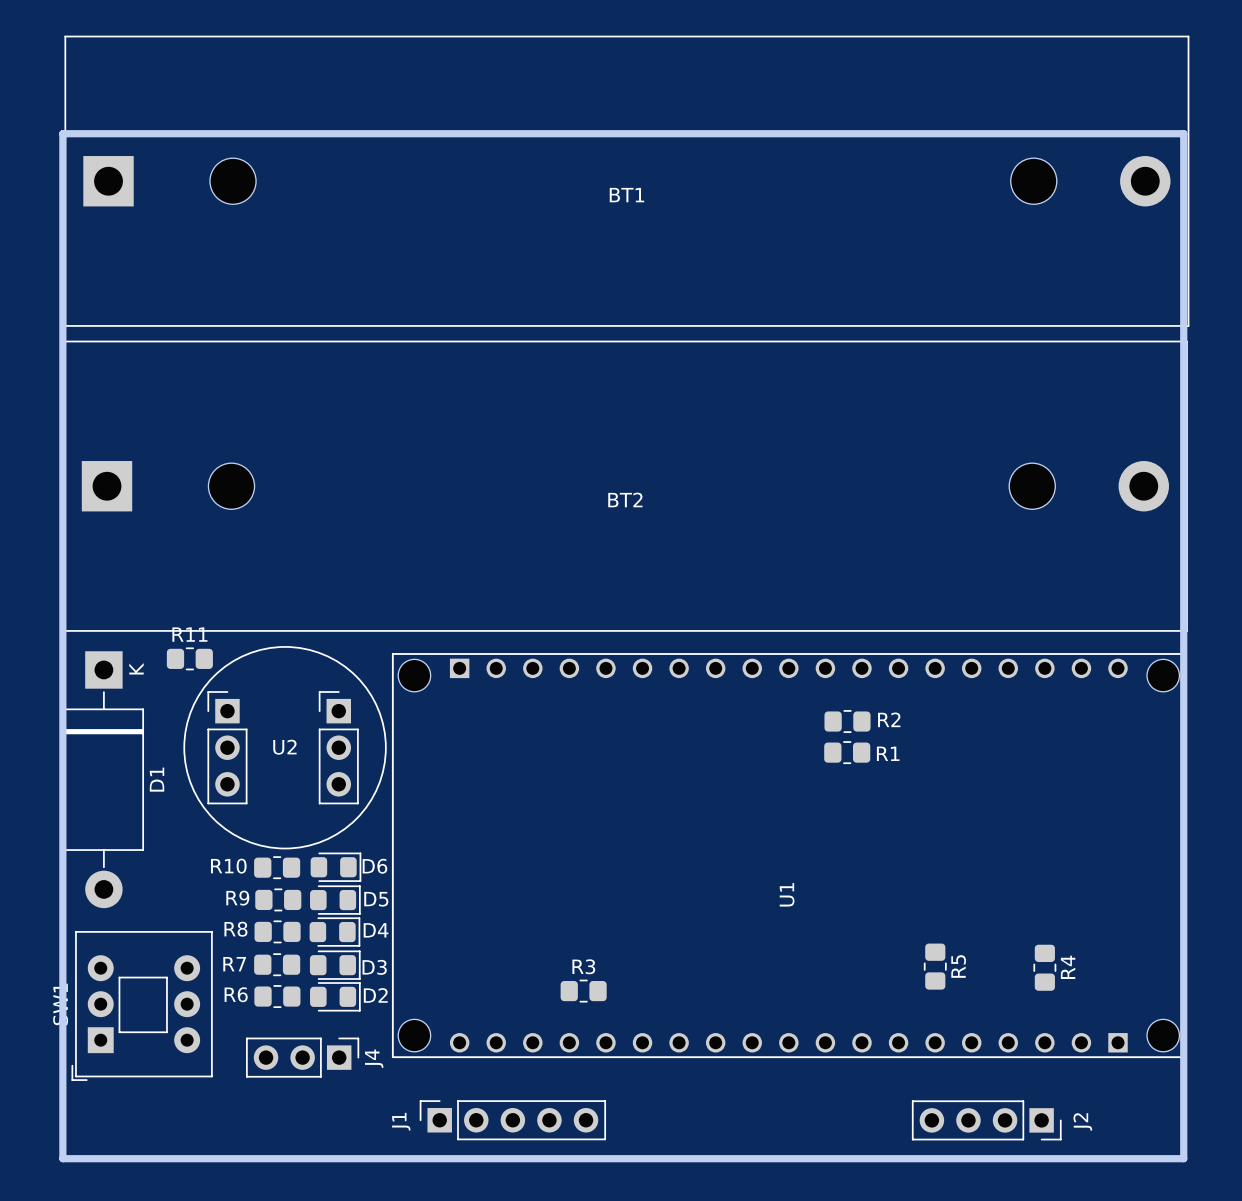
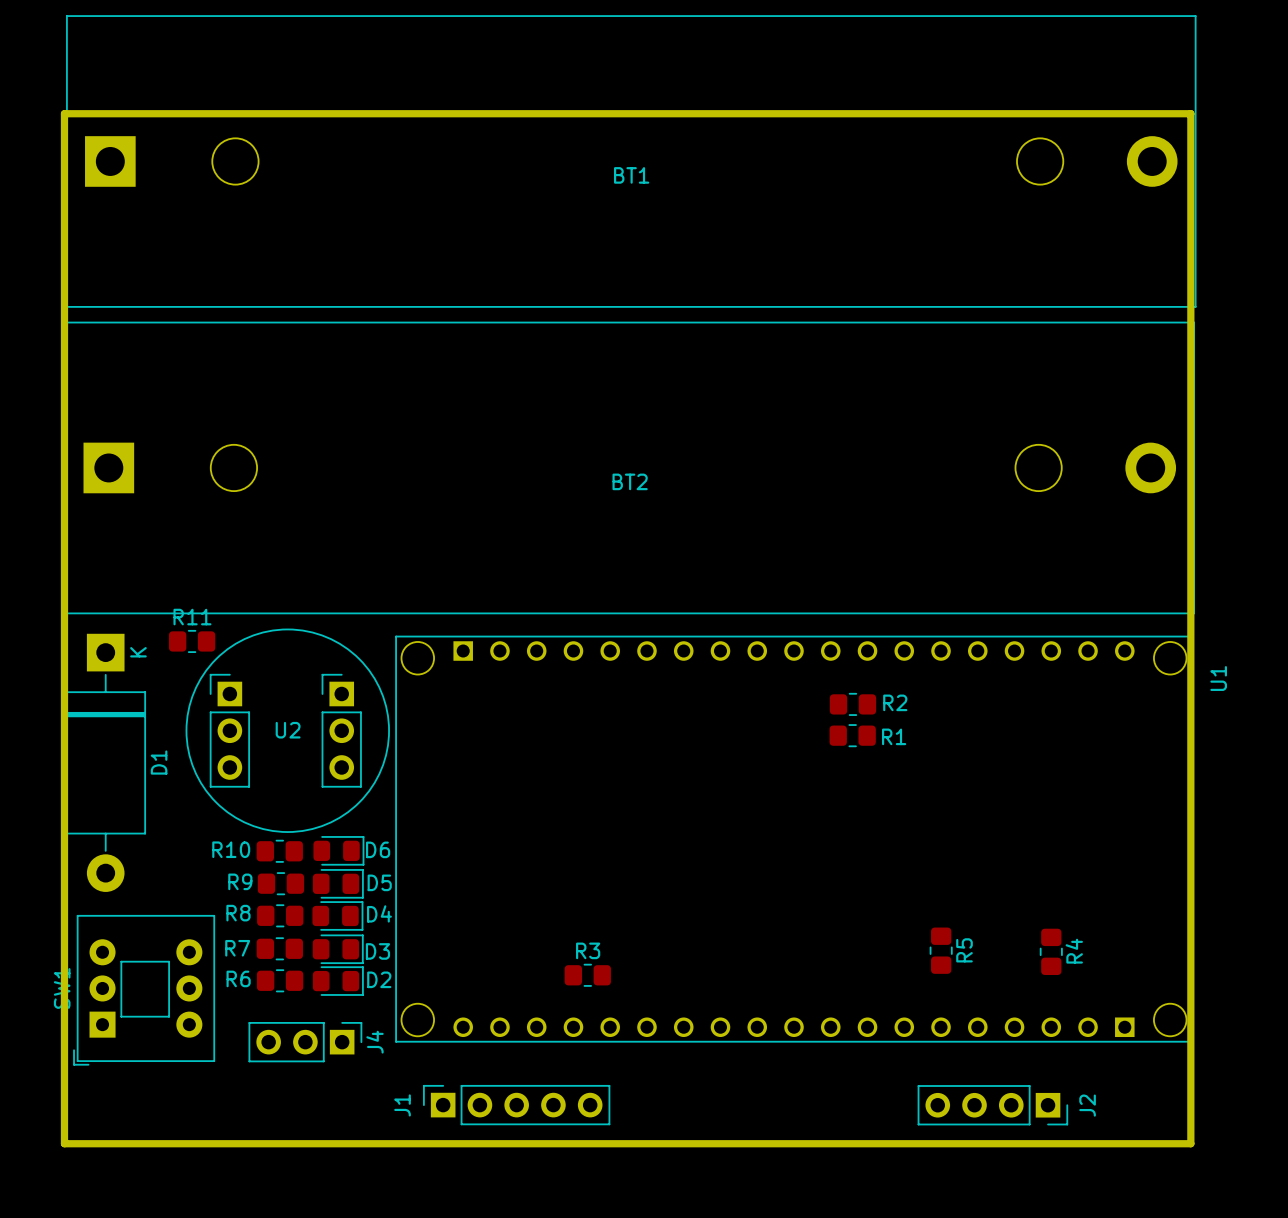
U1 name position: U1 (787, 894) -> U1 (1218, 678)

